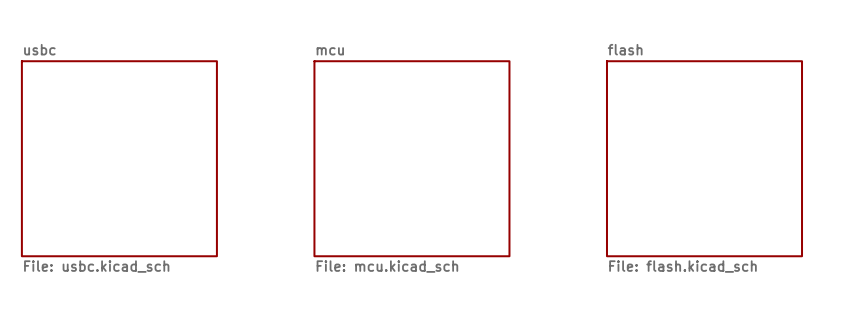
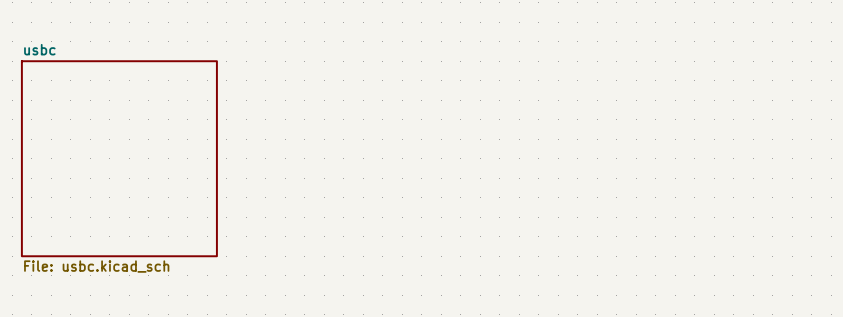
sheet mcu: File: mcu.kicad_sch (411, 158) -> none
sheet flash: File: flash.kicad_sch (704, 158) -> none

